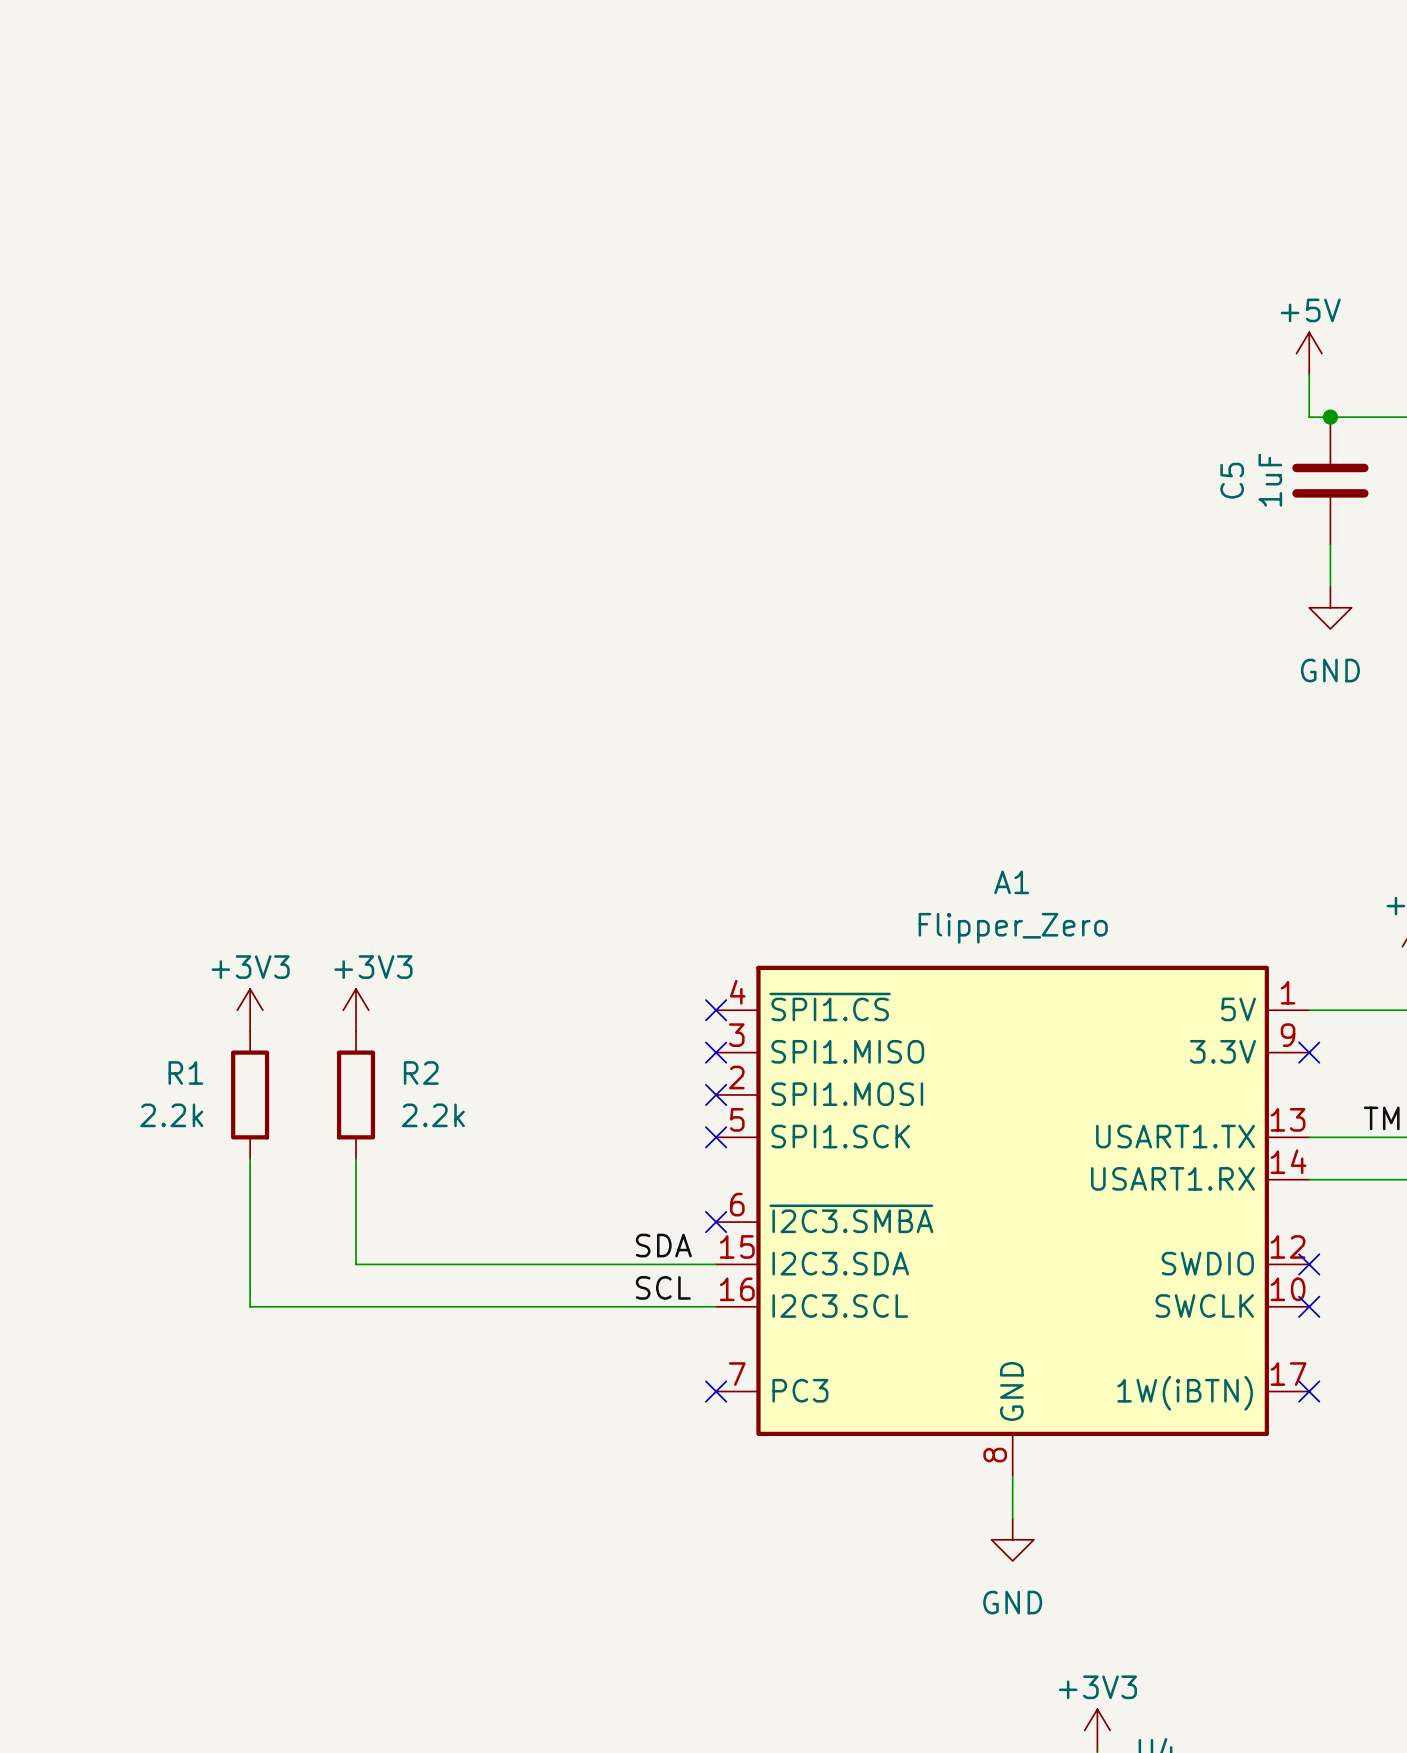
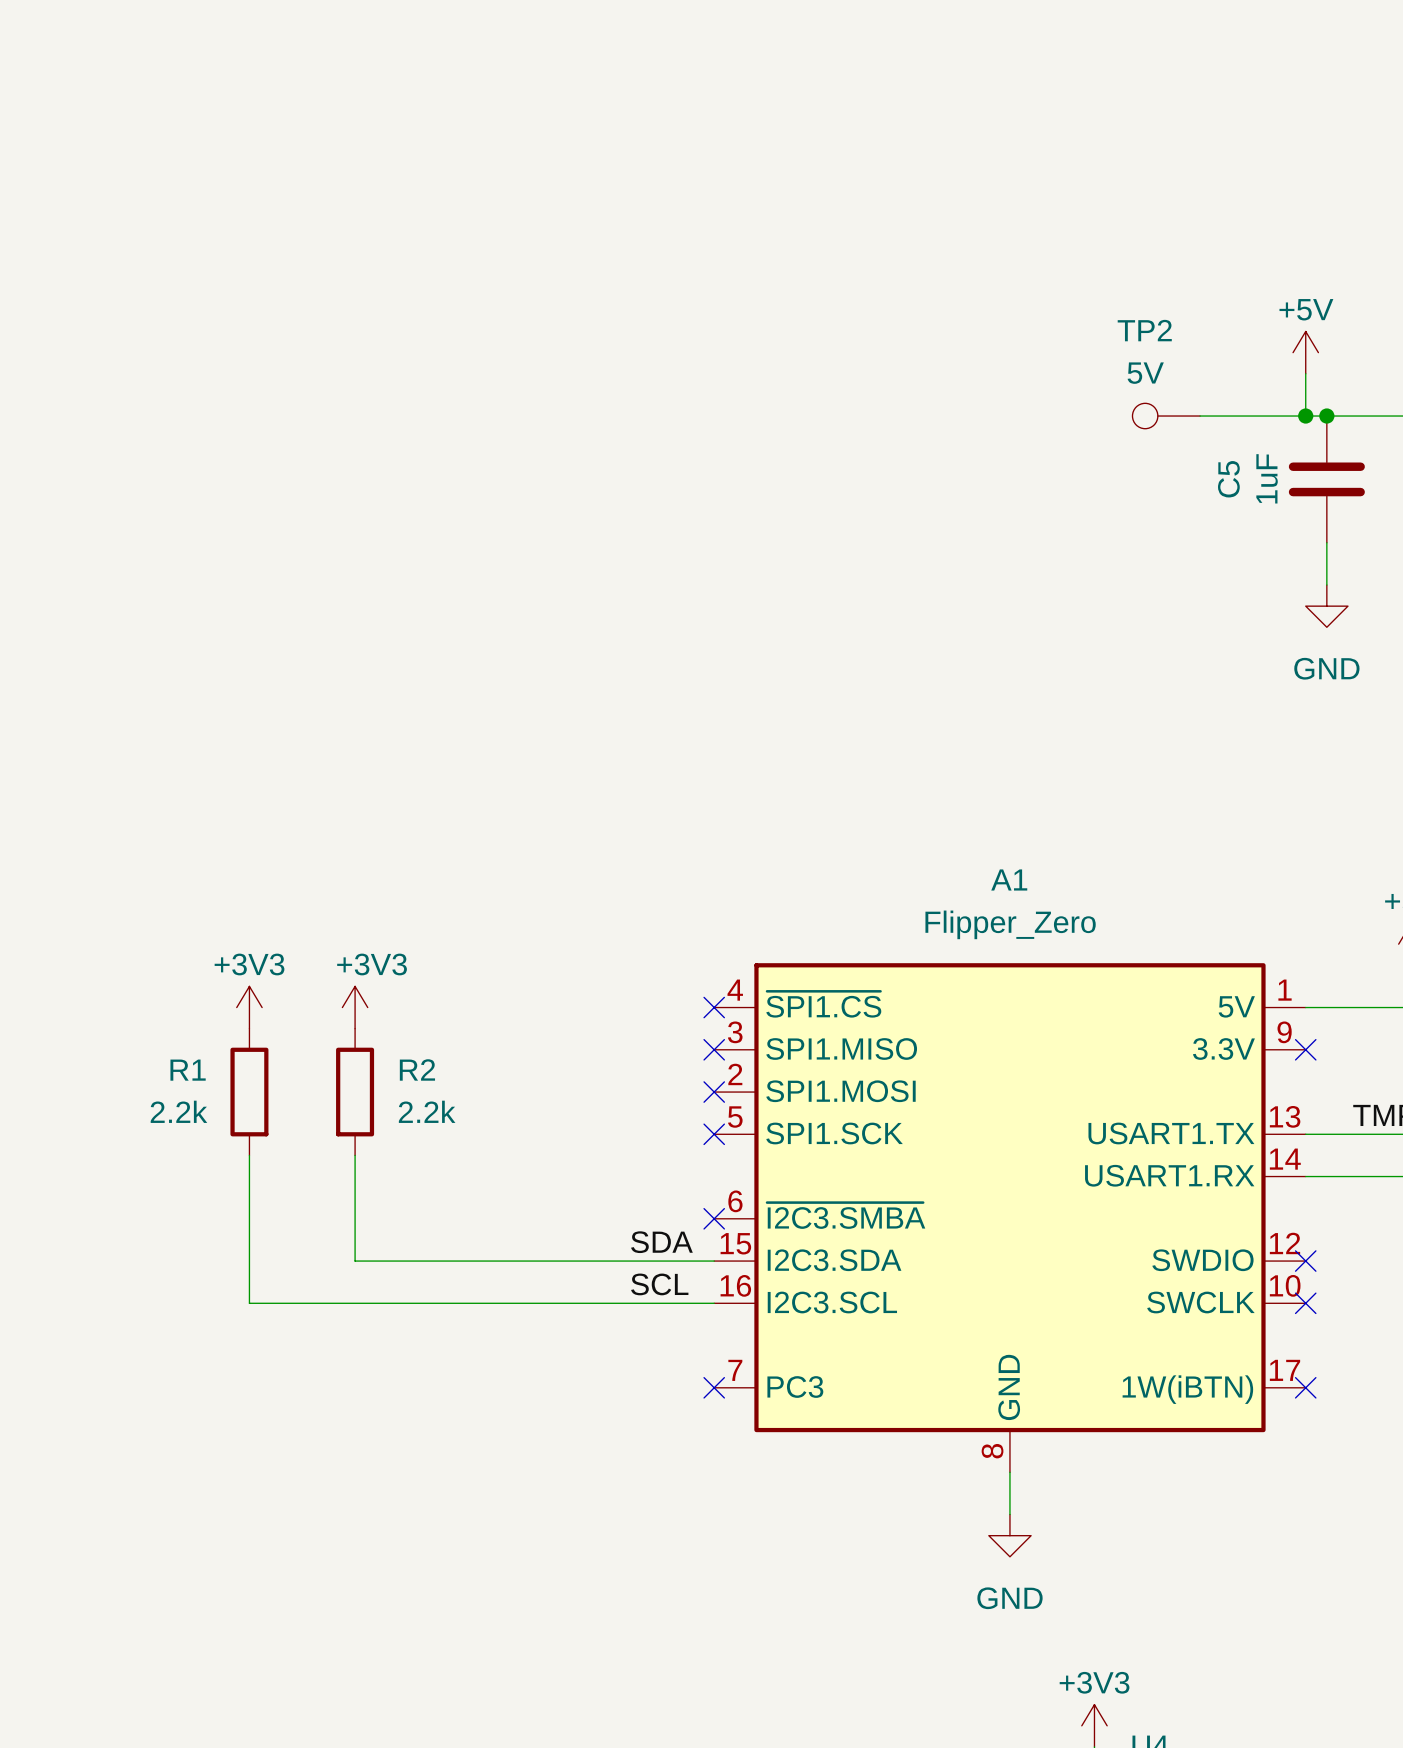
TP2: none -> 5V (1166, 416)
wire: none -> (1200, 416) (1305, 416)
junction: none -> (1305, 416)

